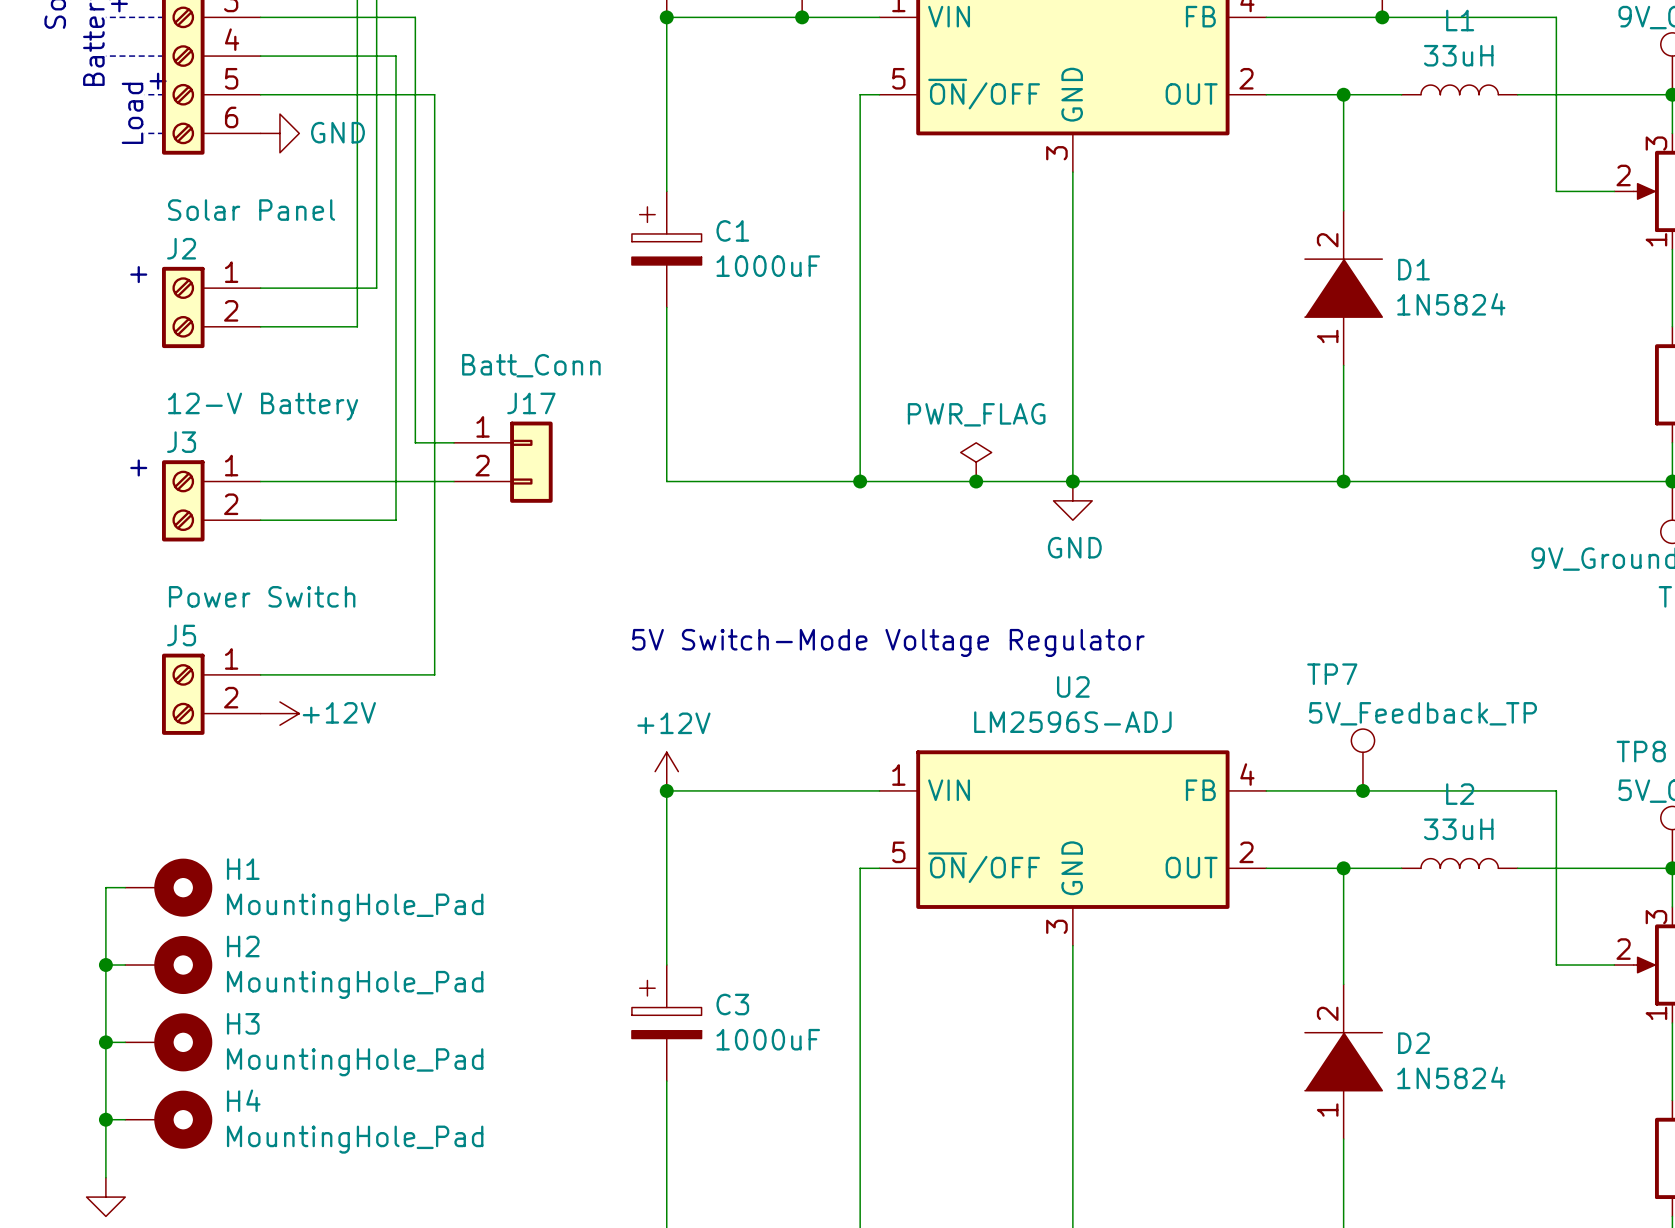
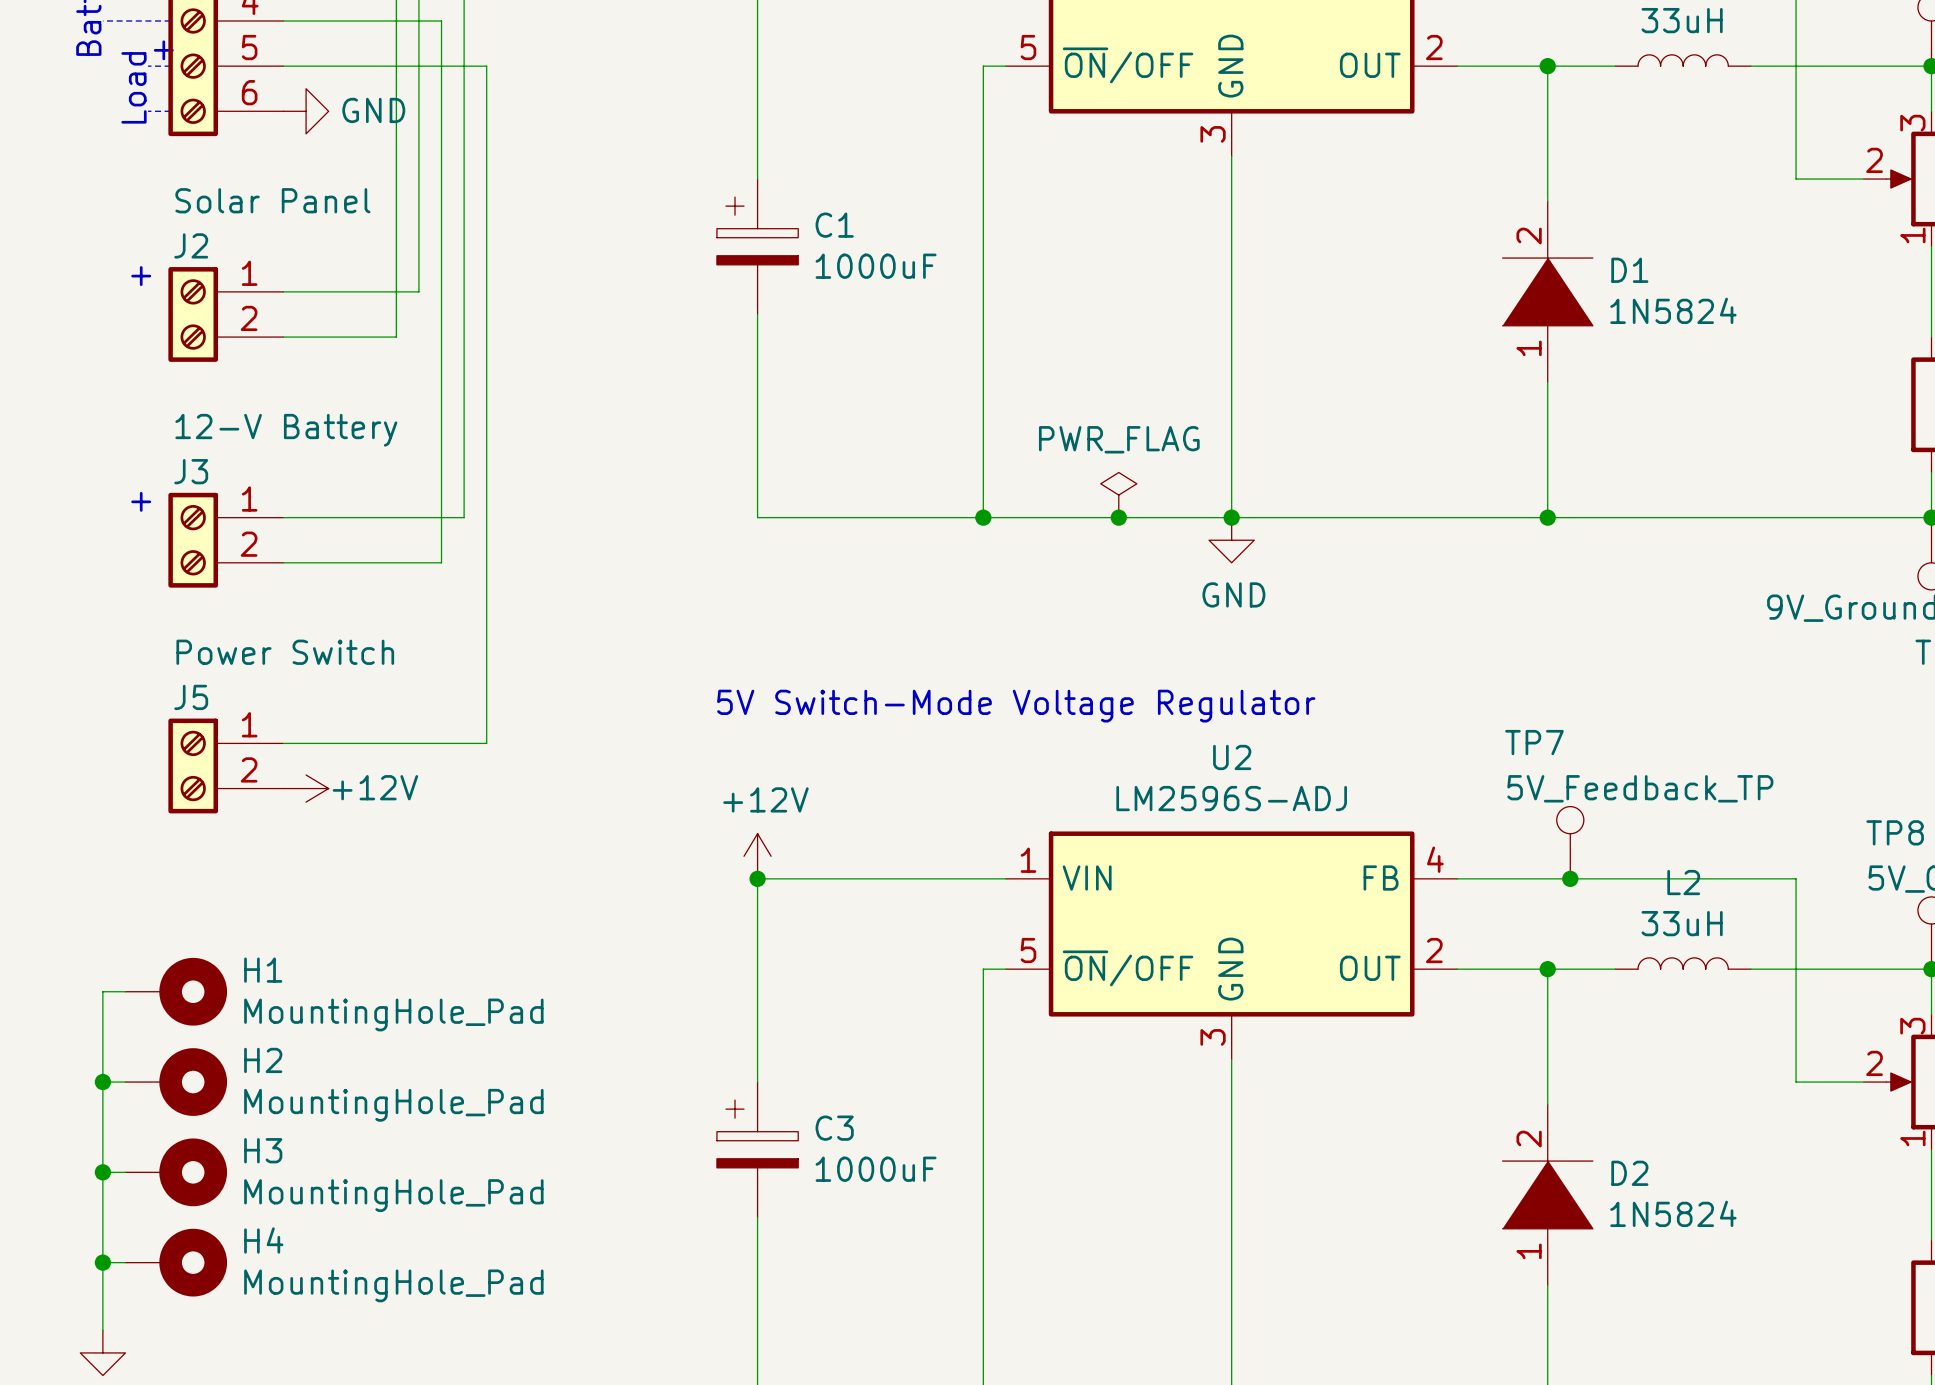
wire: (415, 442) (454, 442) -> (464, 472) (464, 517)
J17: Batt_Conn (503, 462) -> none
wire: (415, 481) (454, 481) -> none

